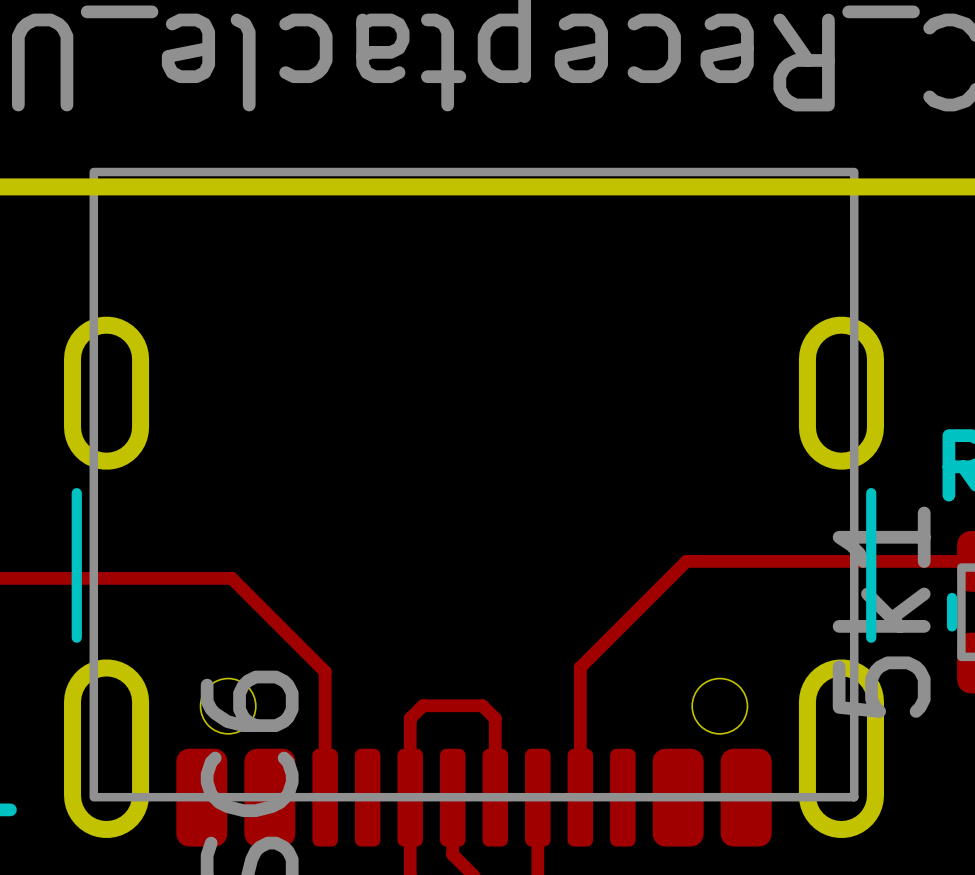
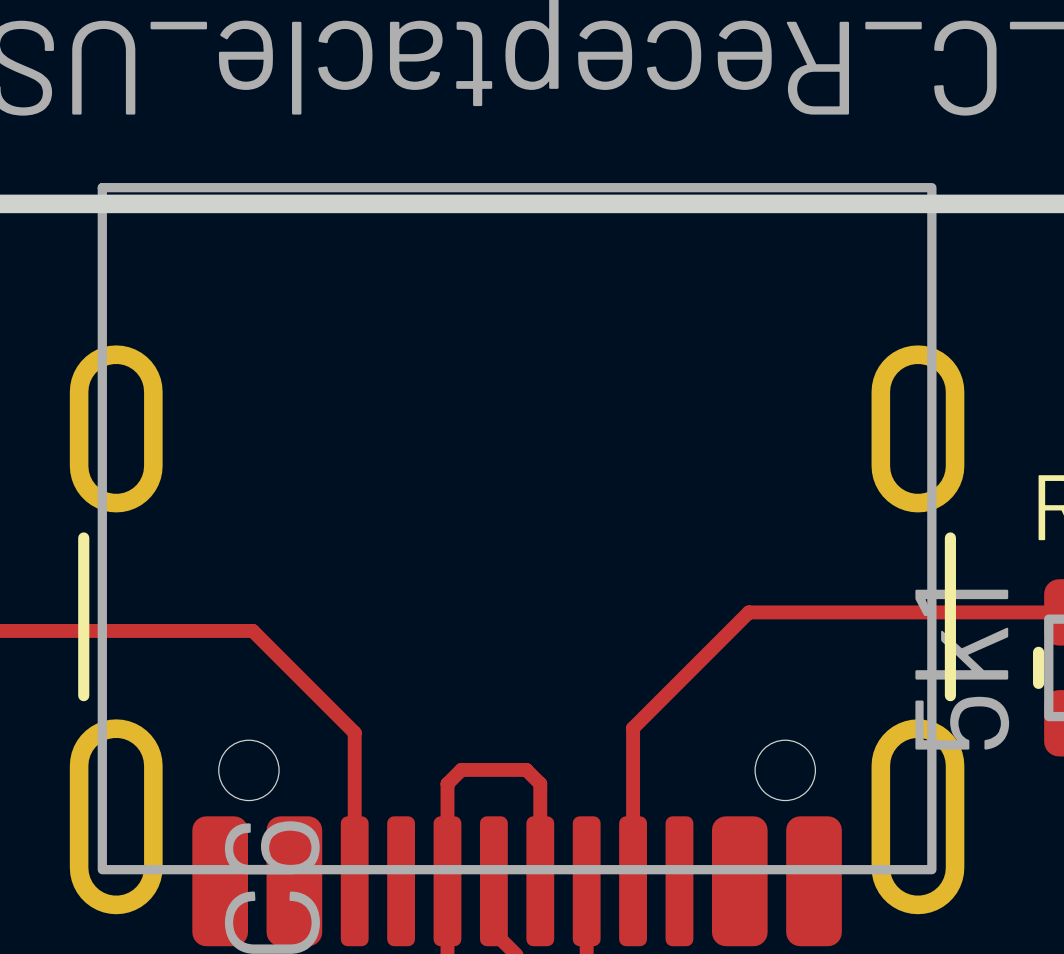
part footprint: [64, 167, 884, 847] -> [69, 183, 965, 947]

